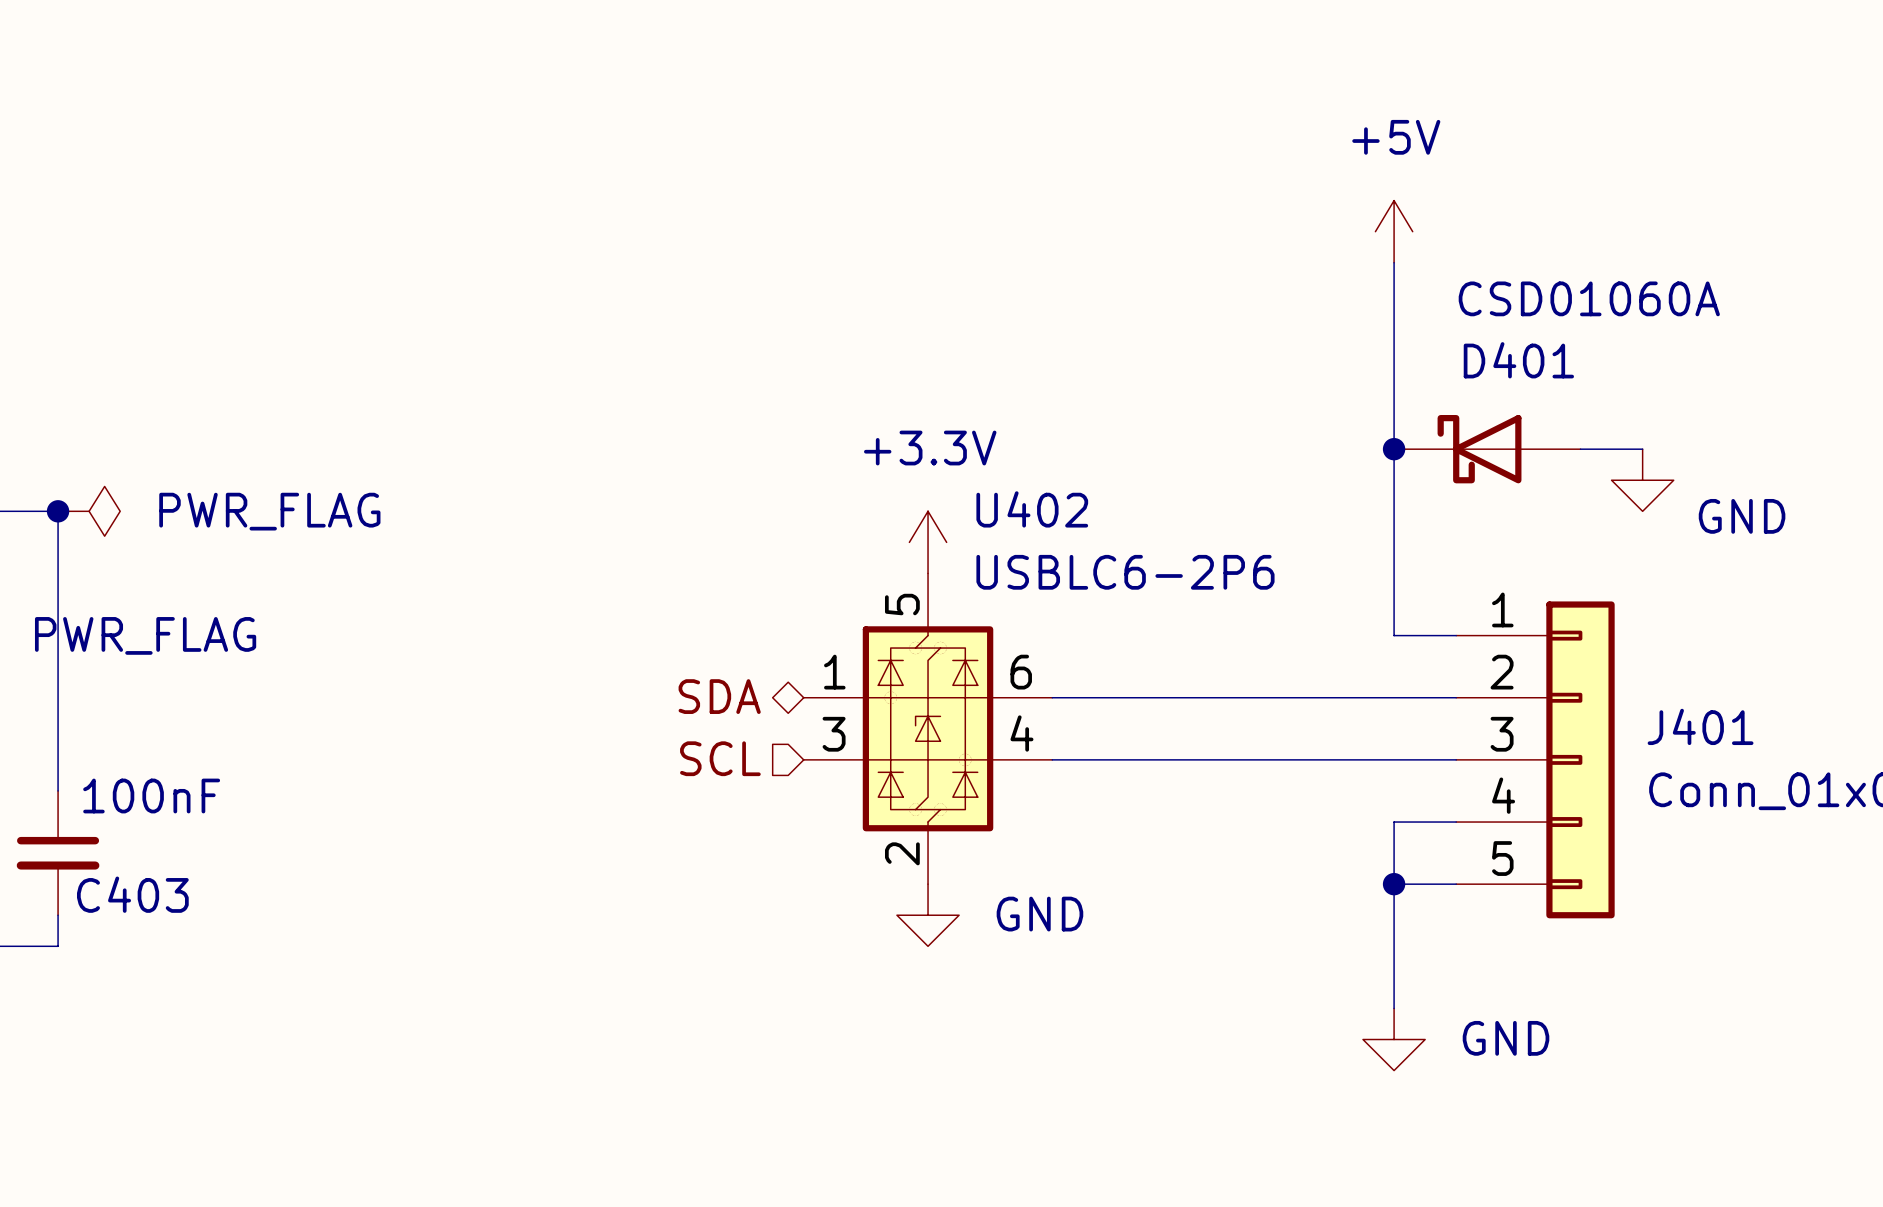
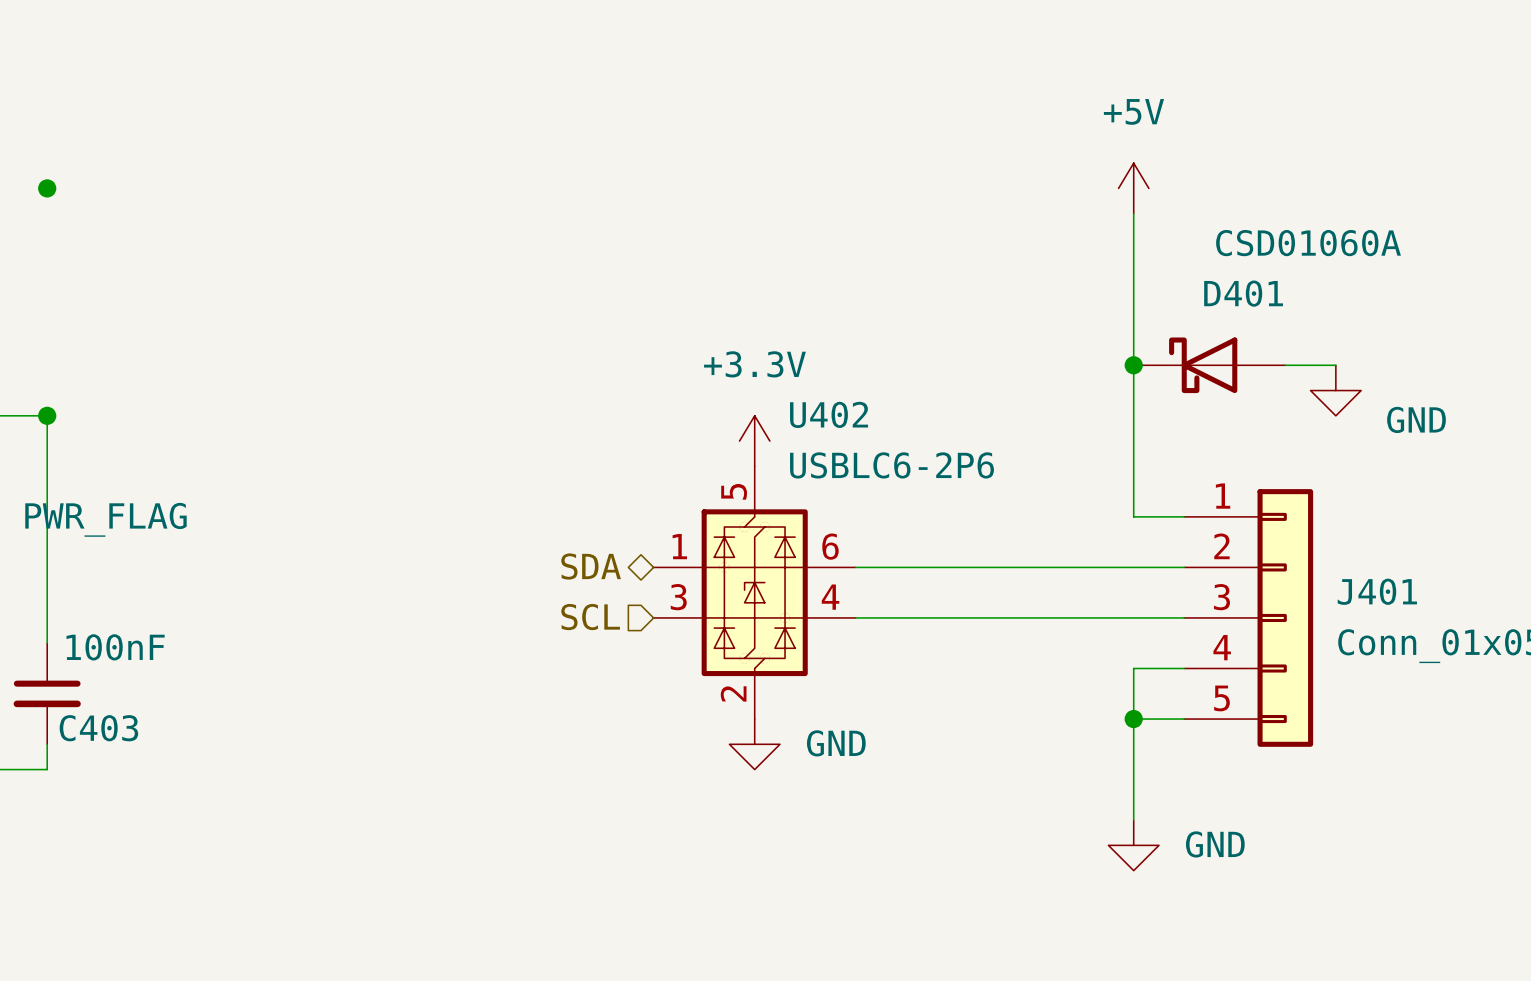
junction: none -> (47, 188)
power symbol: PWR_FLAG (89, 511) -> none

